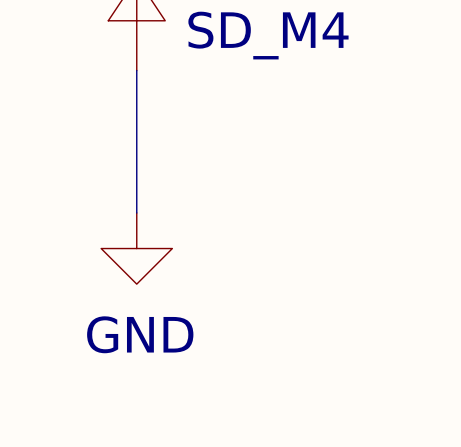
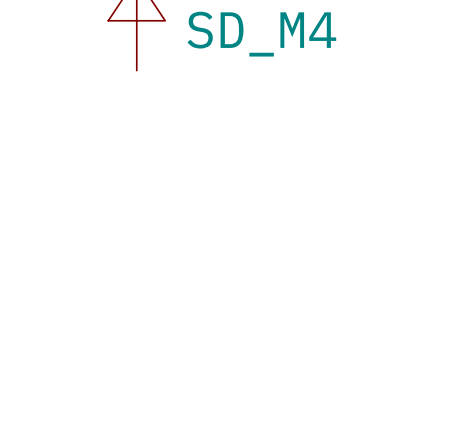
wire: (136, 70) (136, 212) -> none
power symbol: GND (136, 248) -> none

